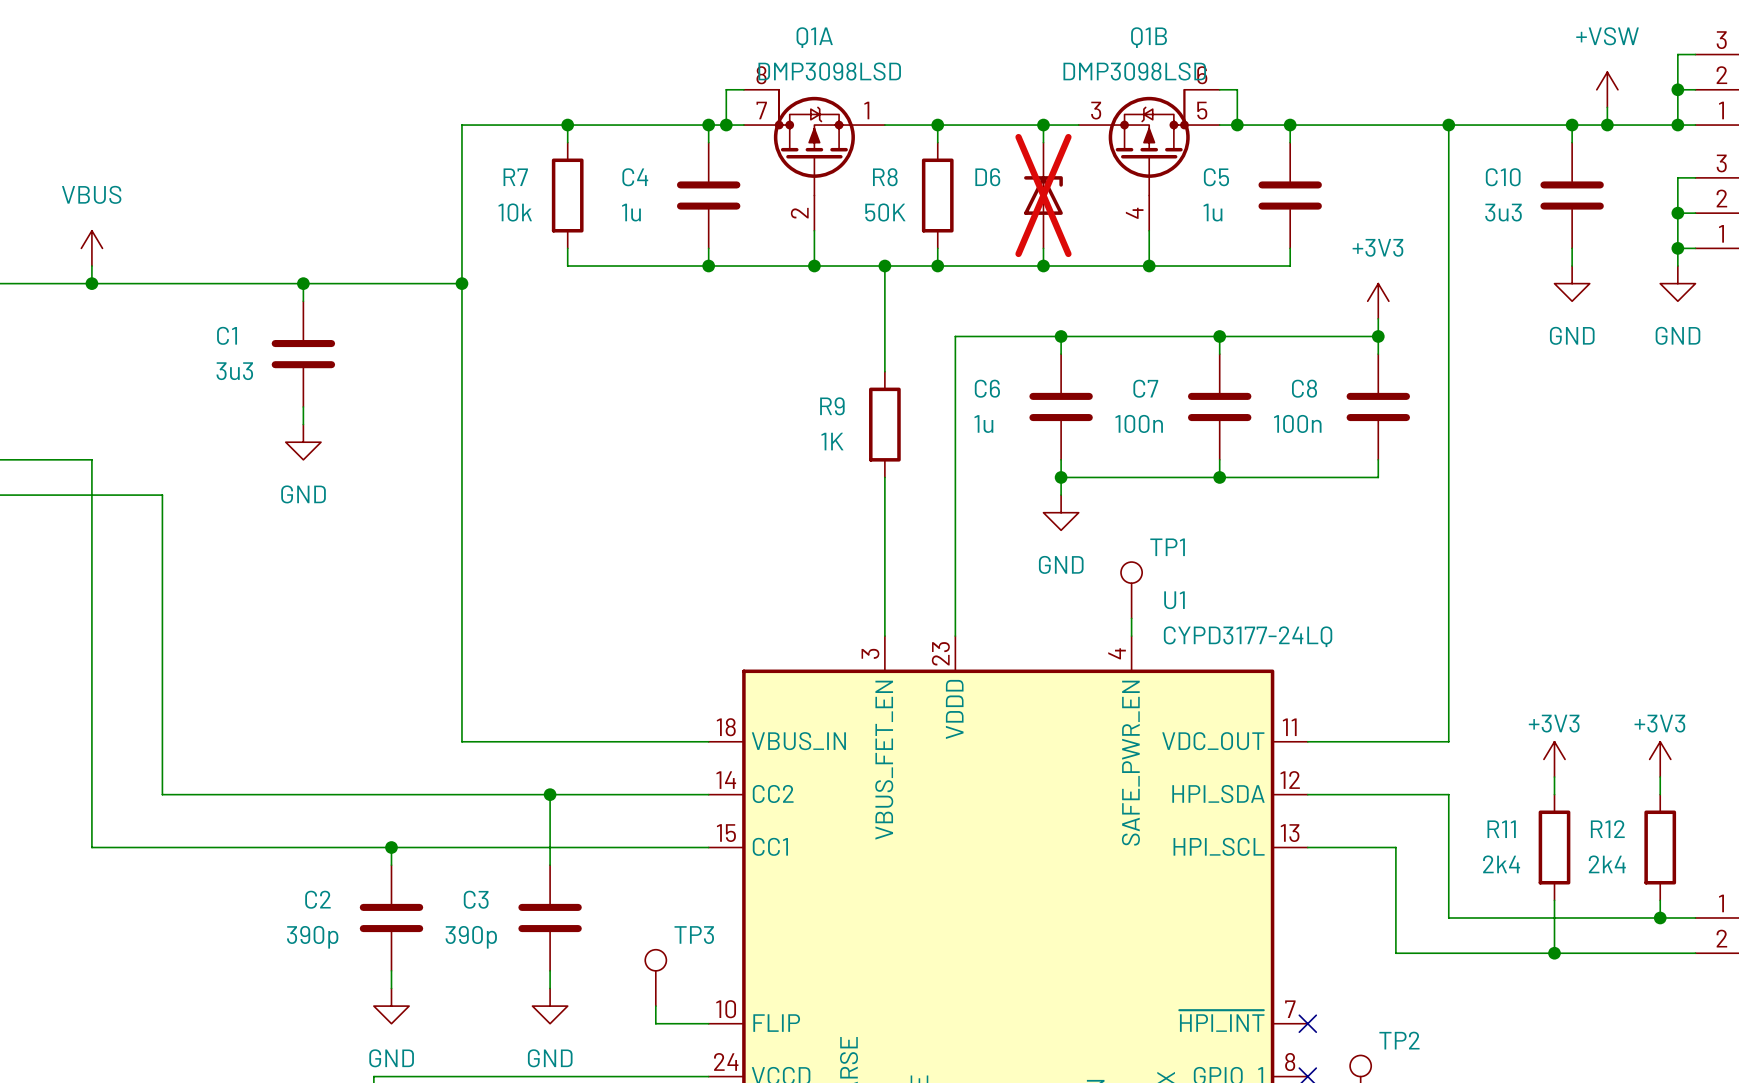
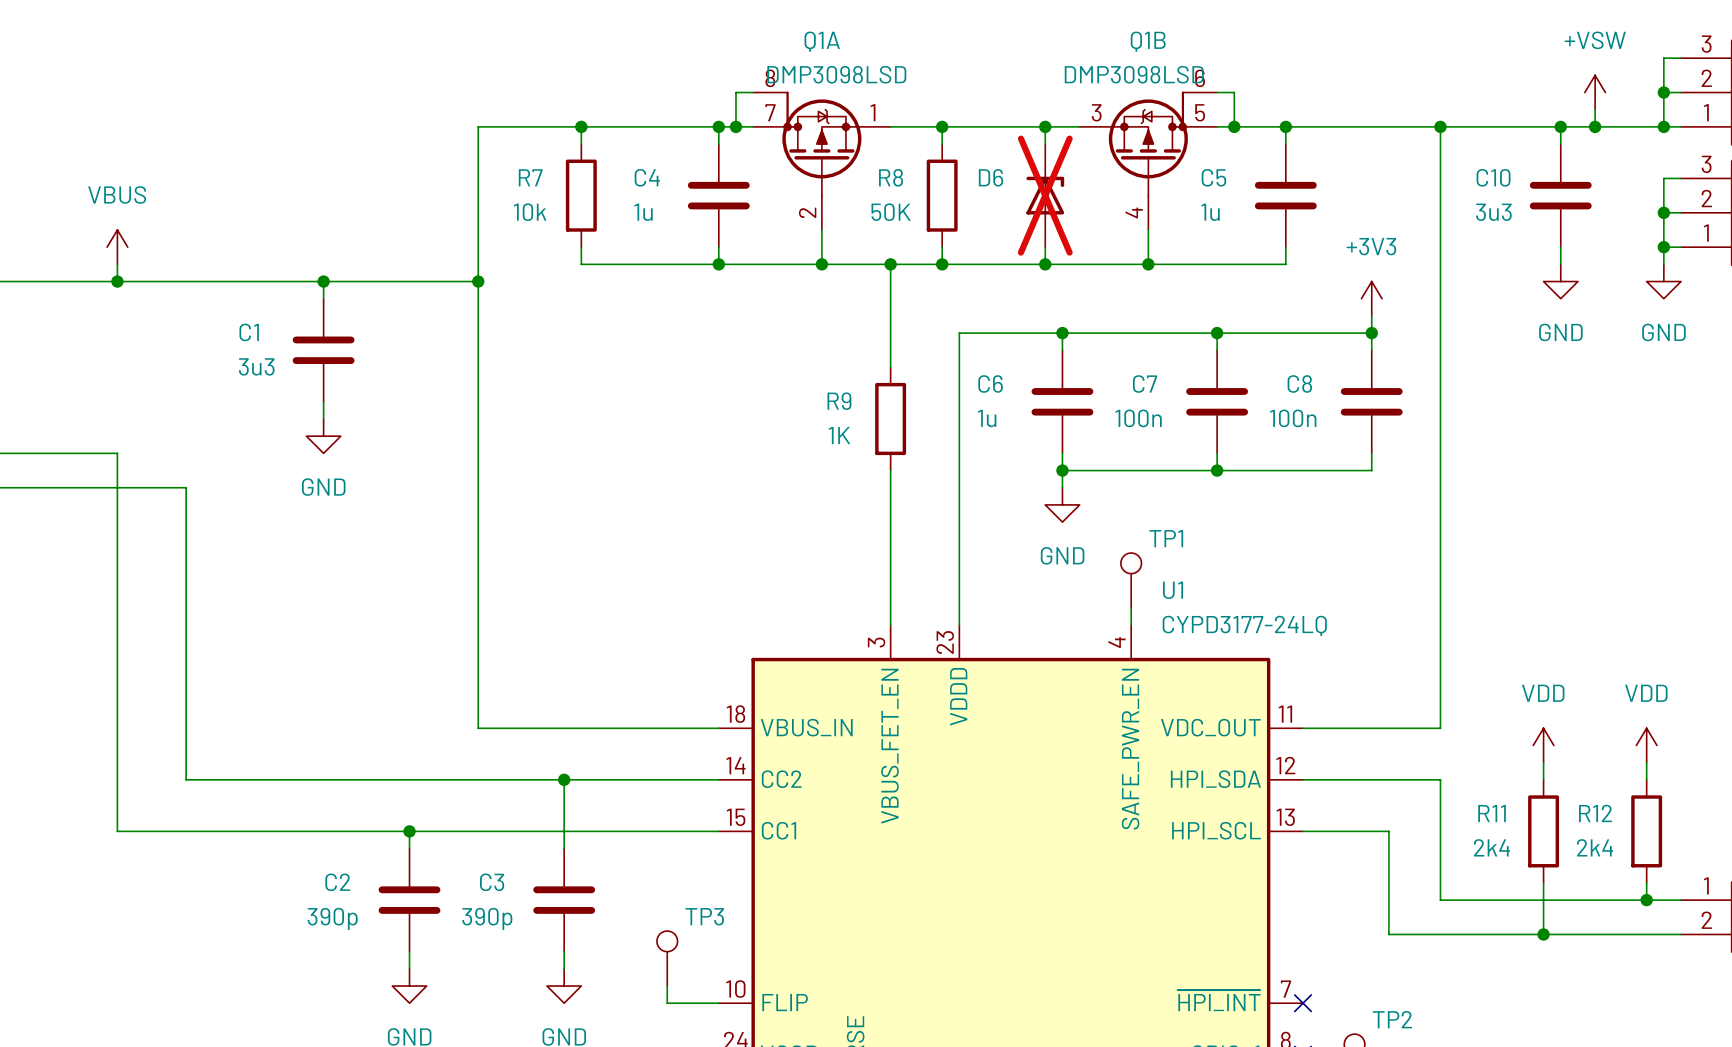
power symbol: +3V3 (1554, 759) -> VDD (1543, 745)
power symbol: +3V3 (1660, 759) -> VDD (1646, 745)

